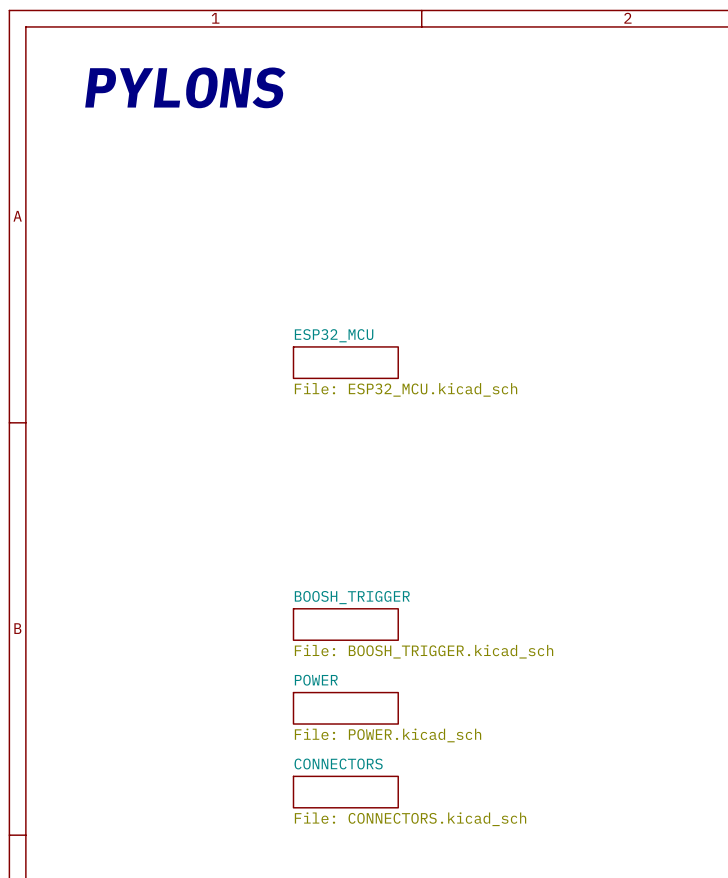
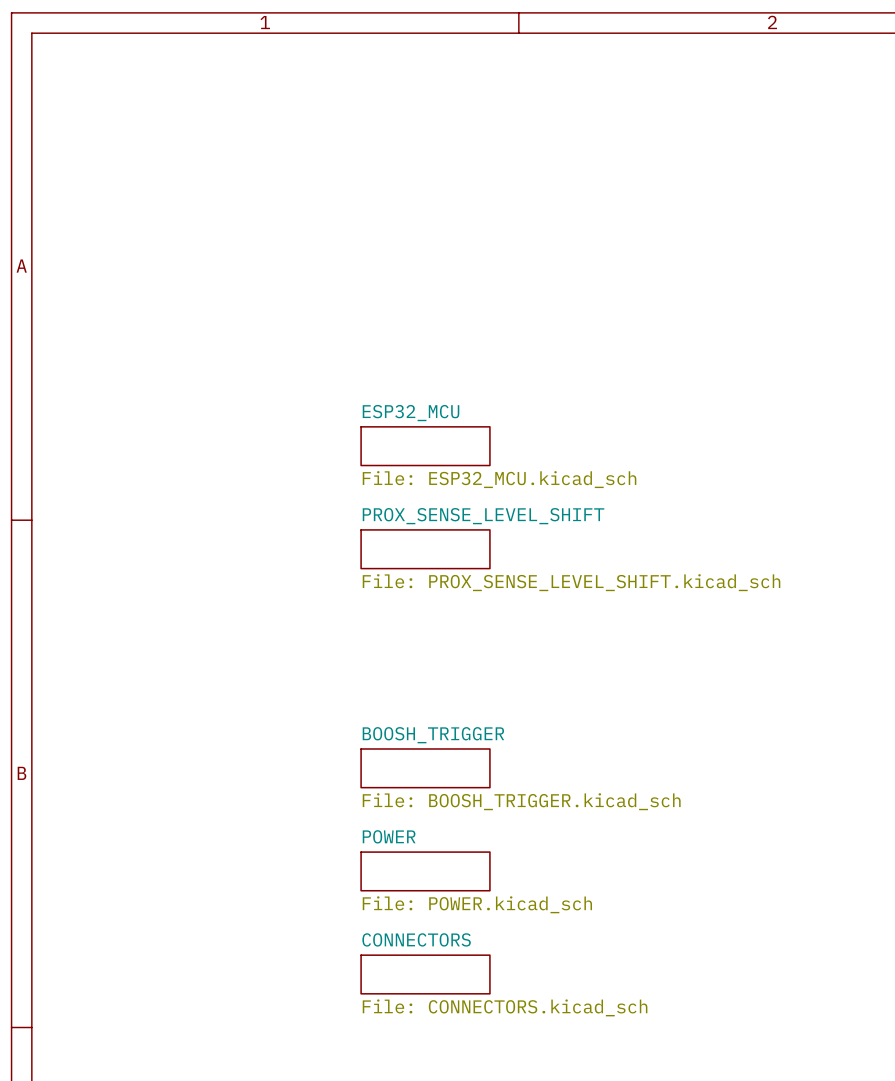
text: PYLONS (185, 87) -> none
sheet PROX_SENSE_LEVEL_SHIFT: none -> File: PROX_SENSE_LEVEL_SHIFT.kicad_sch (425, 549)

